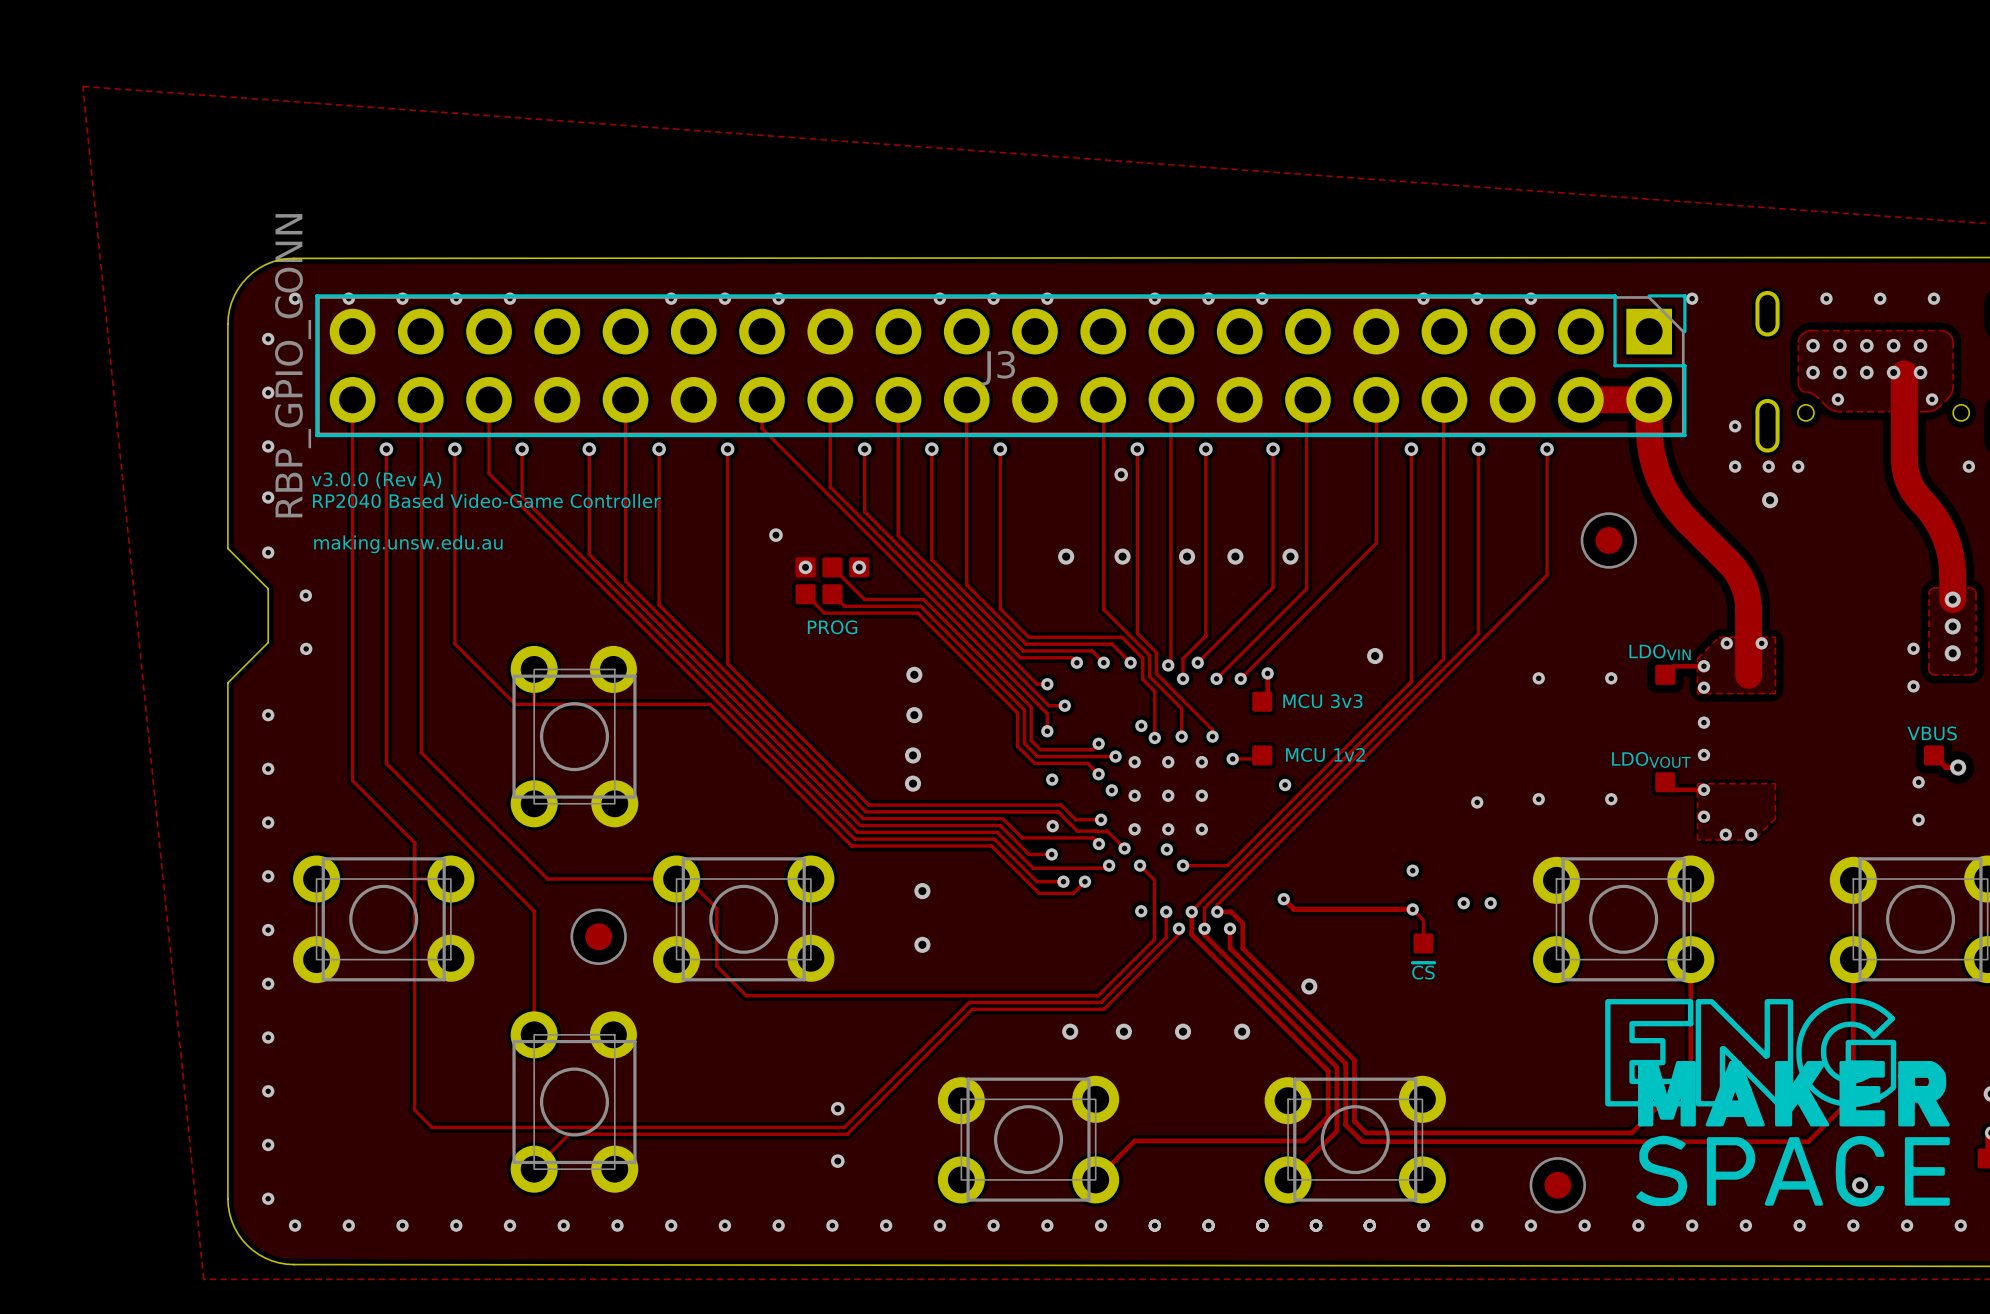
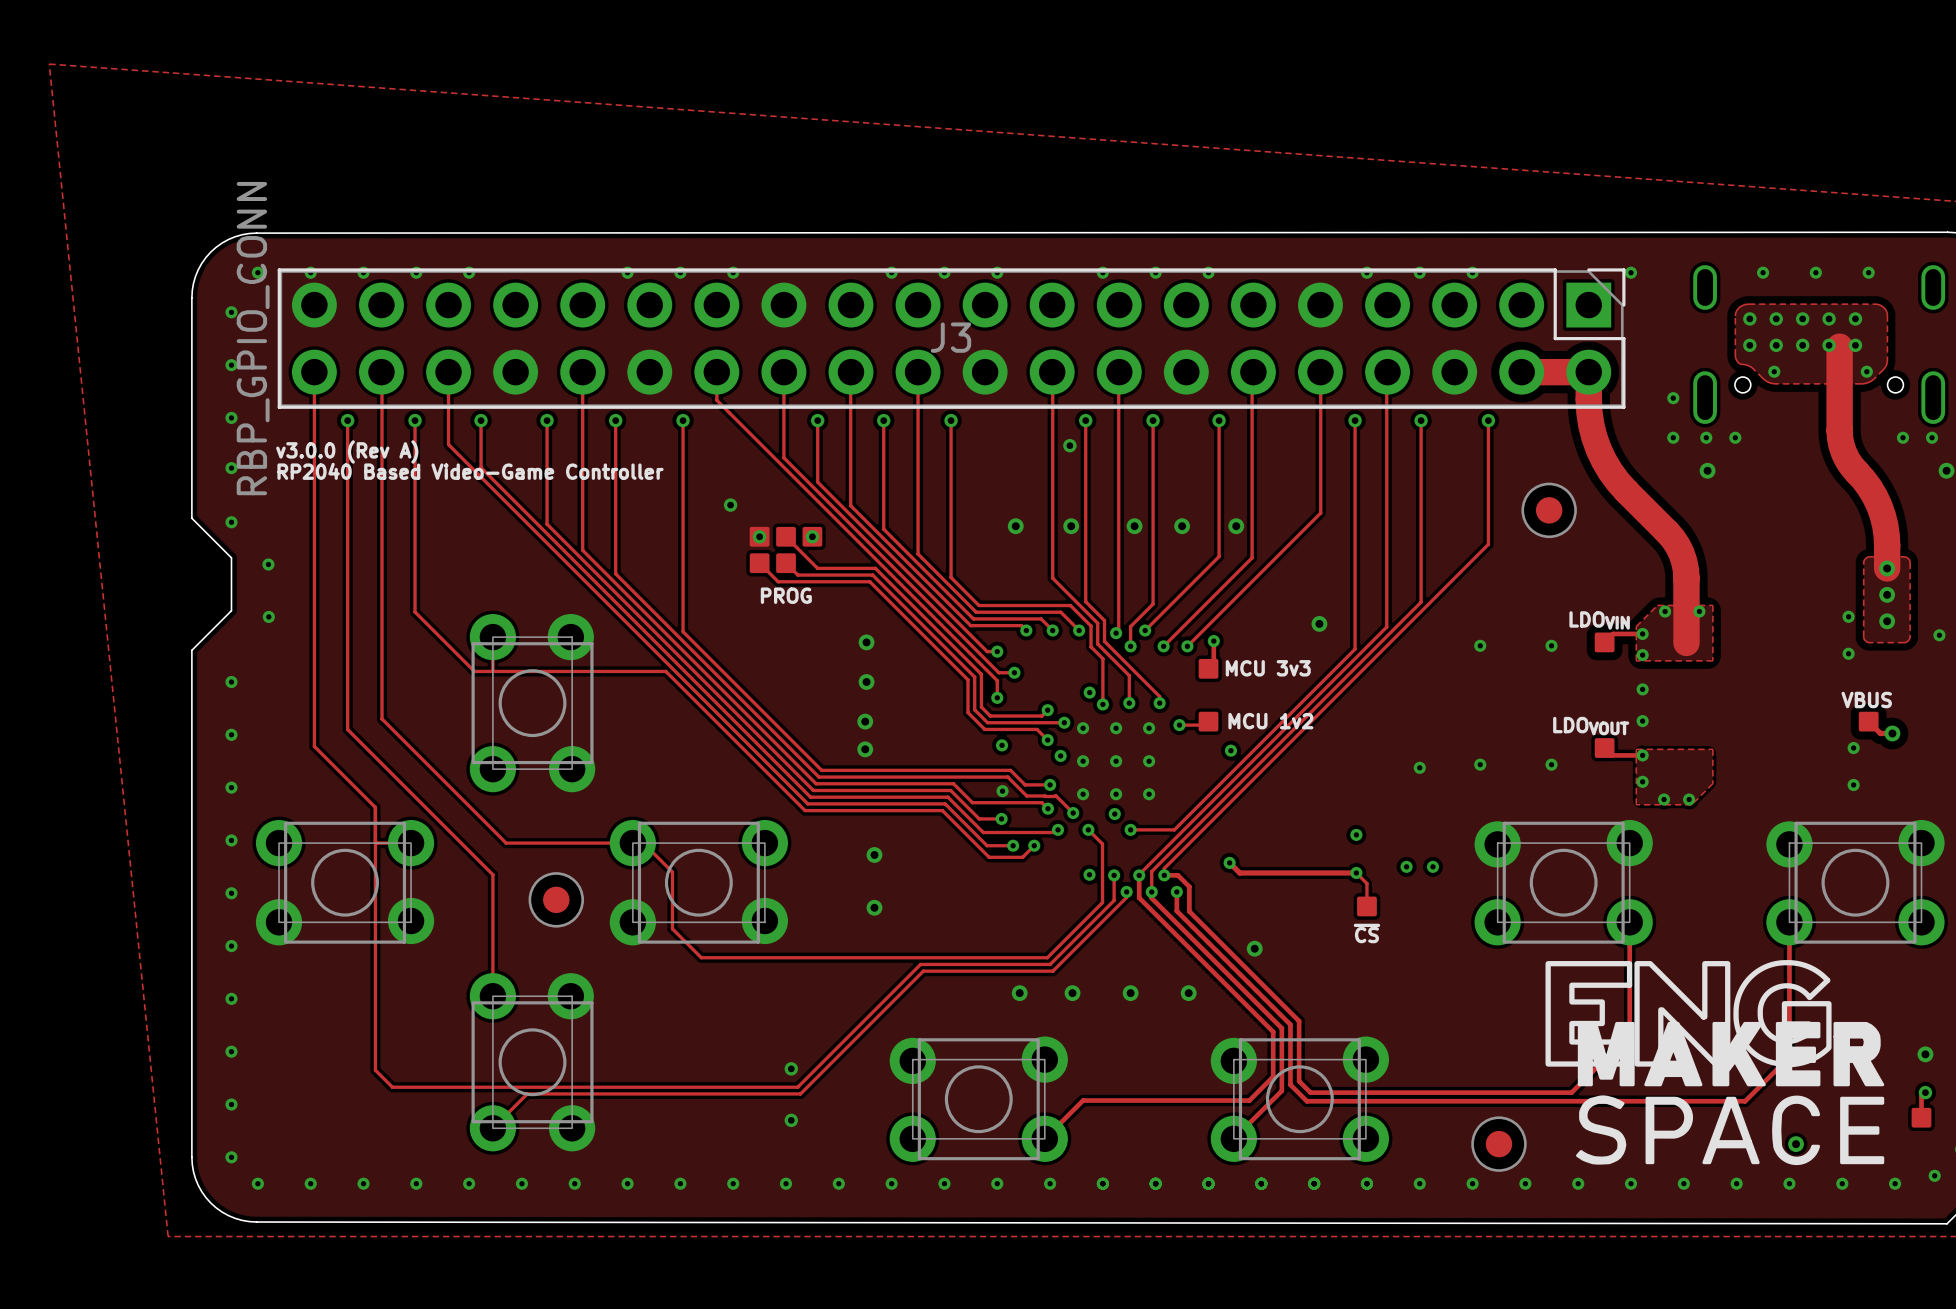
text: making.unsw.edu.au (408, 544) -> none

